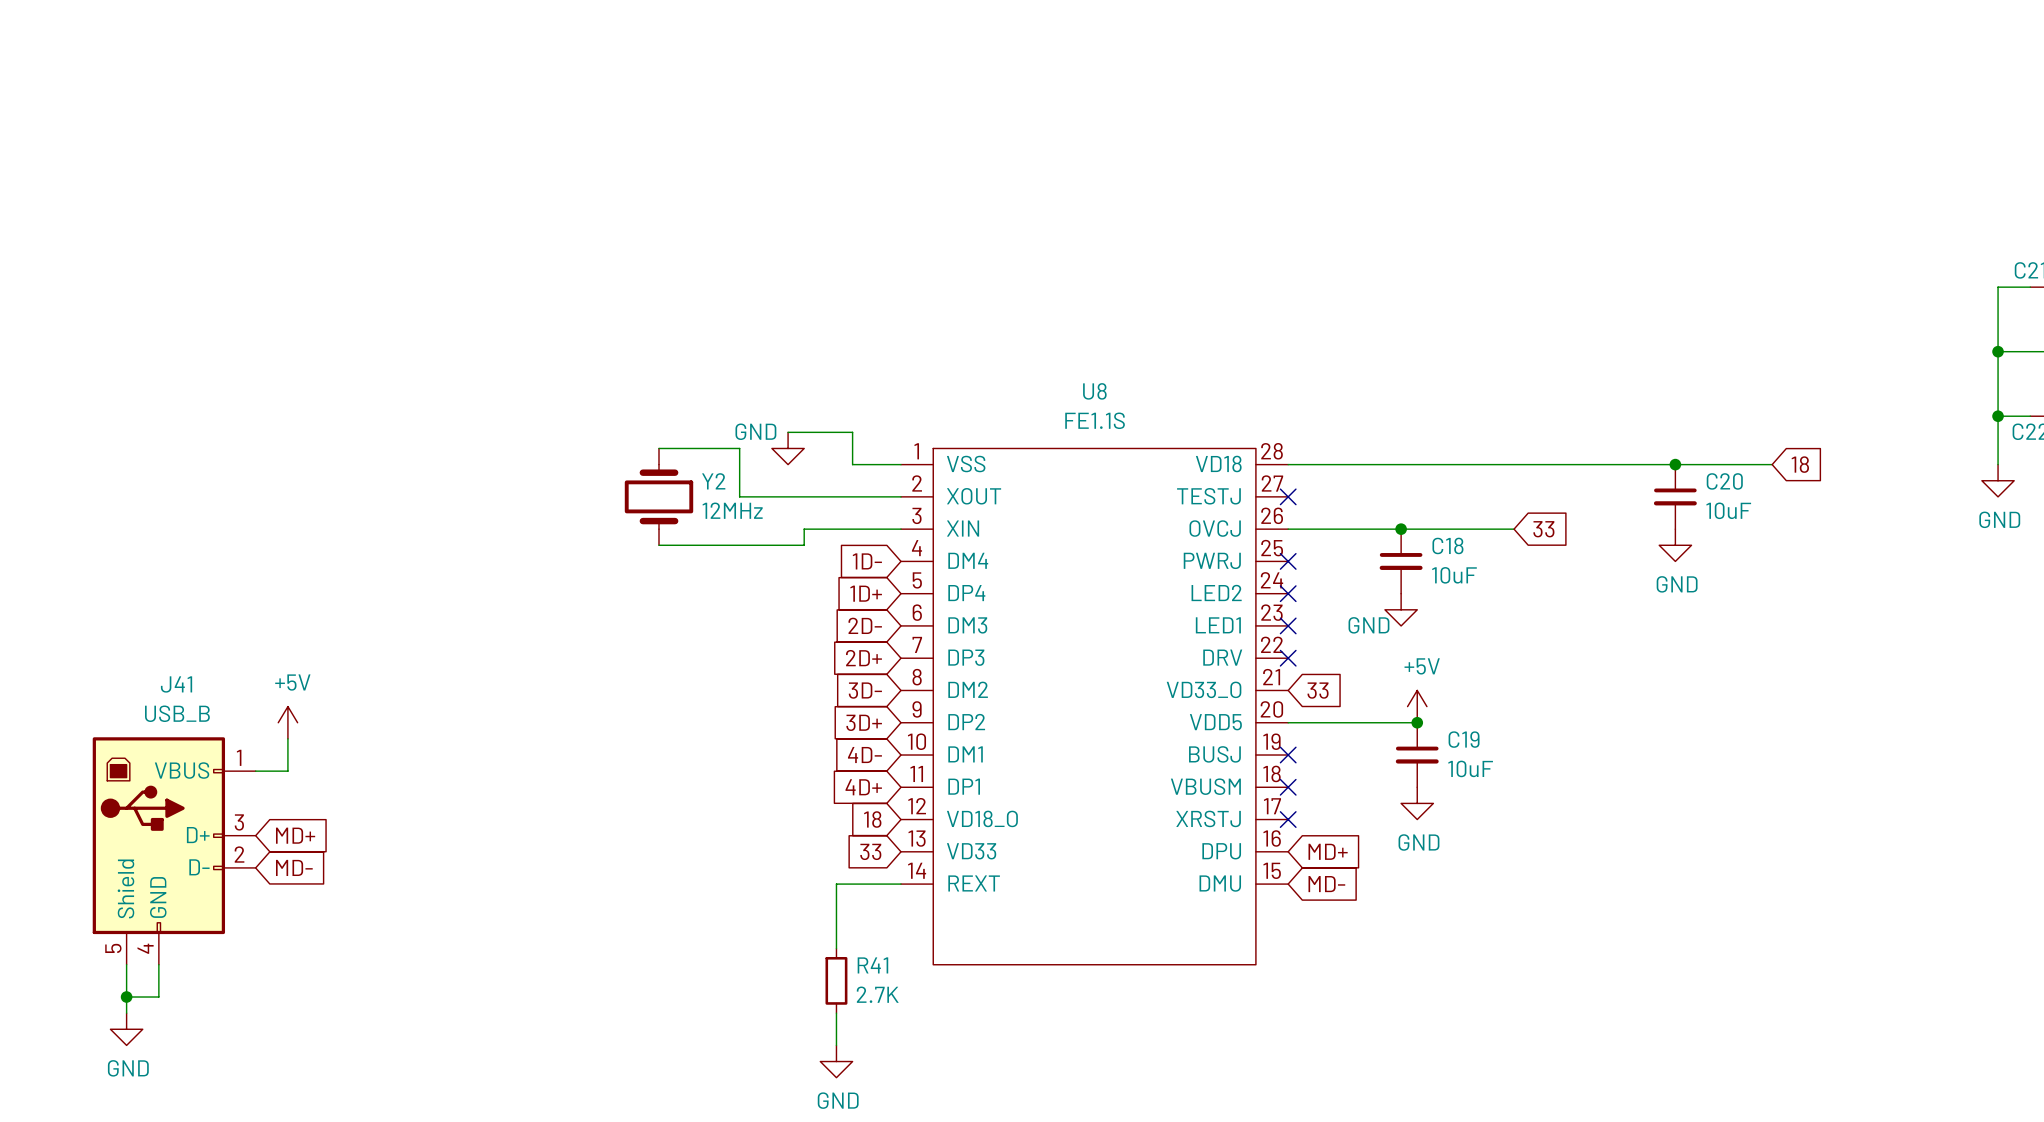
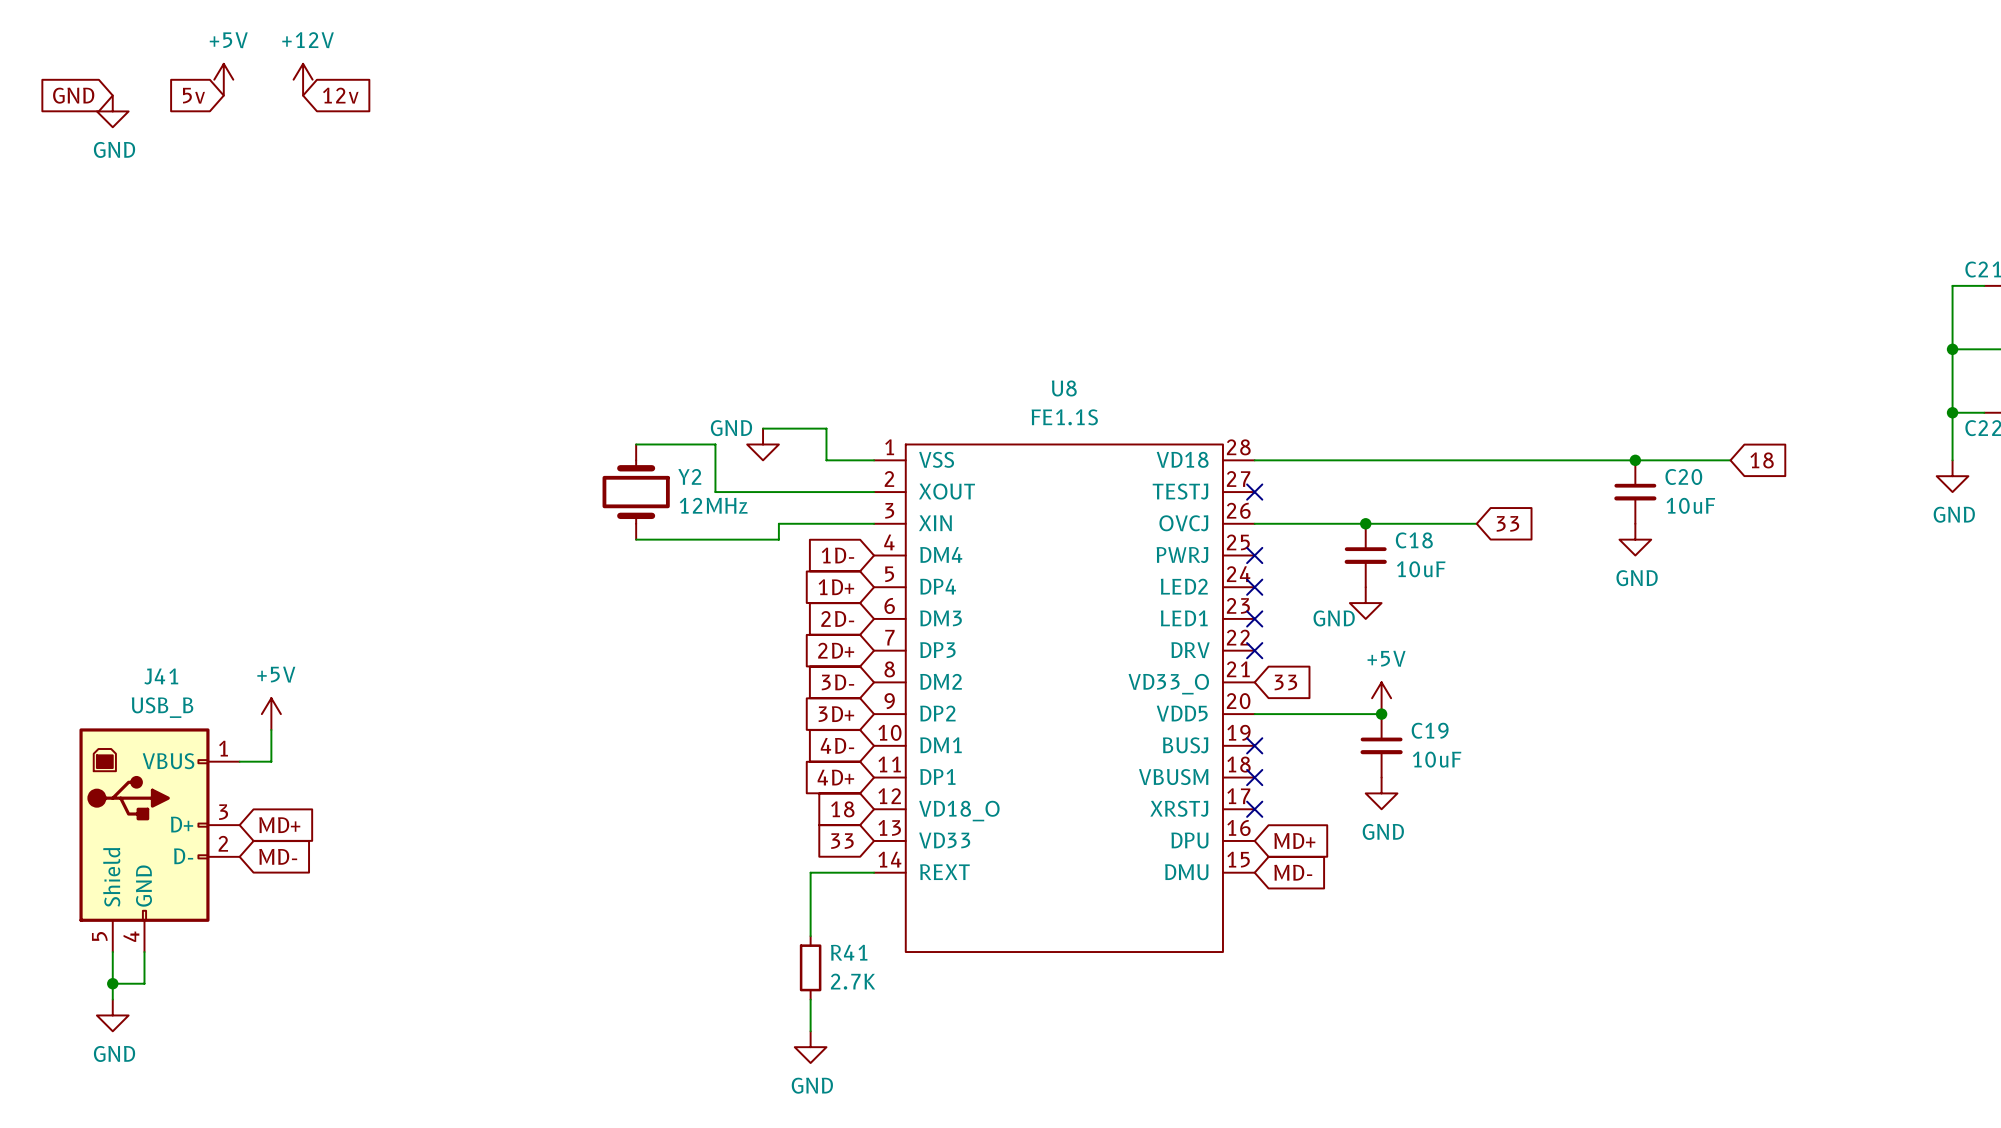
power symbol: none -> +5V (223, 79)
power symbol: none -> +12V (303, 79)
global label: none -> GND (73, 95)
global label: none -> 5v (193, 95)
global label: none -> 12v (340, 95)
power symbol: none -> GND (112, 111)

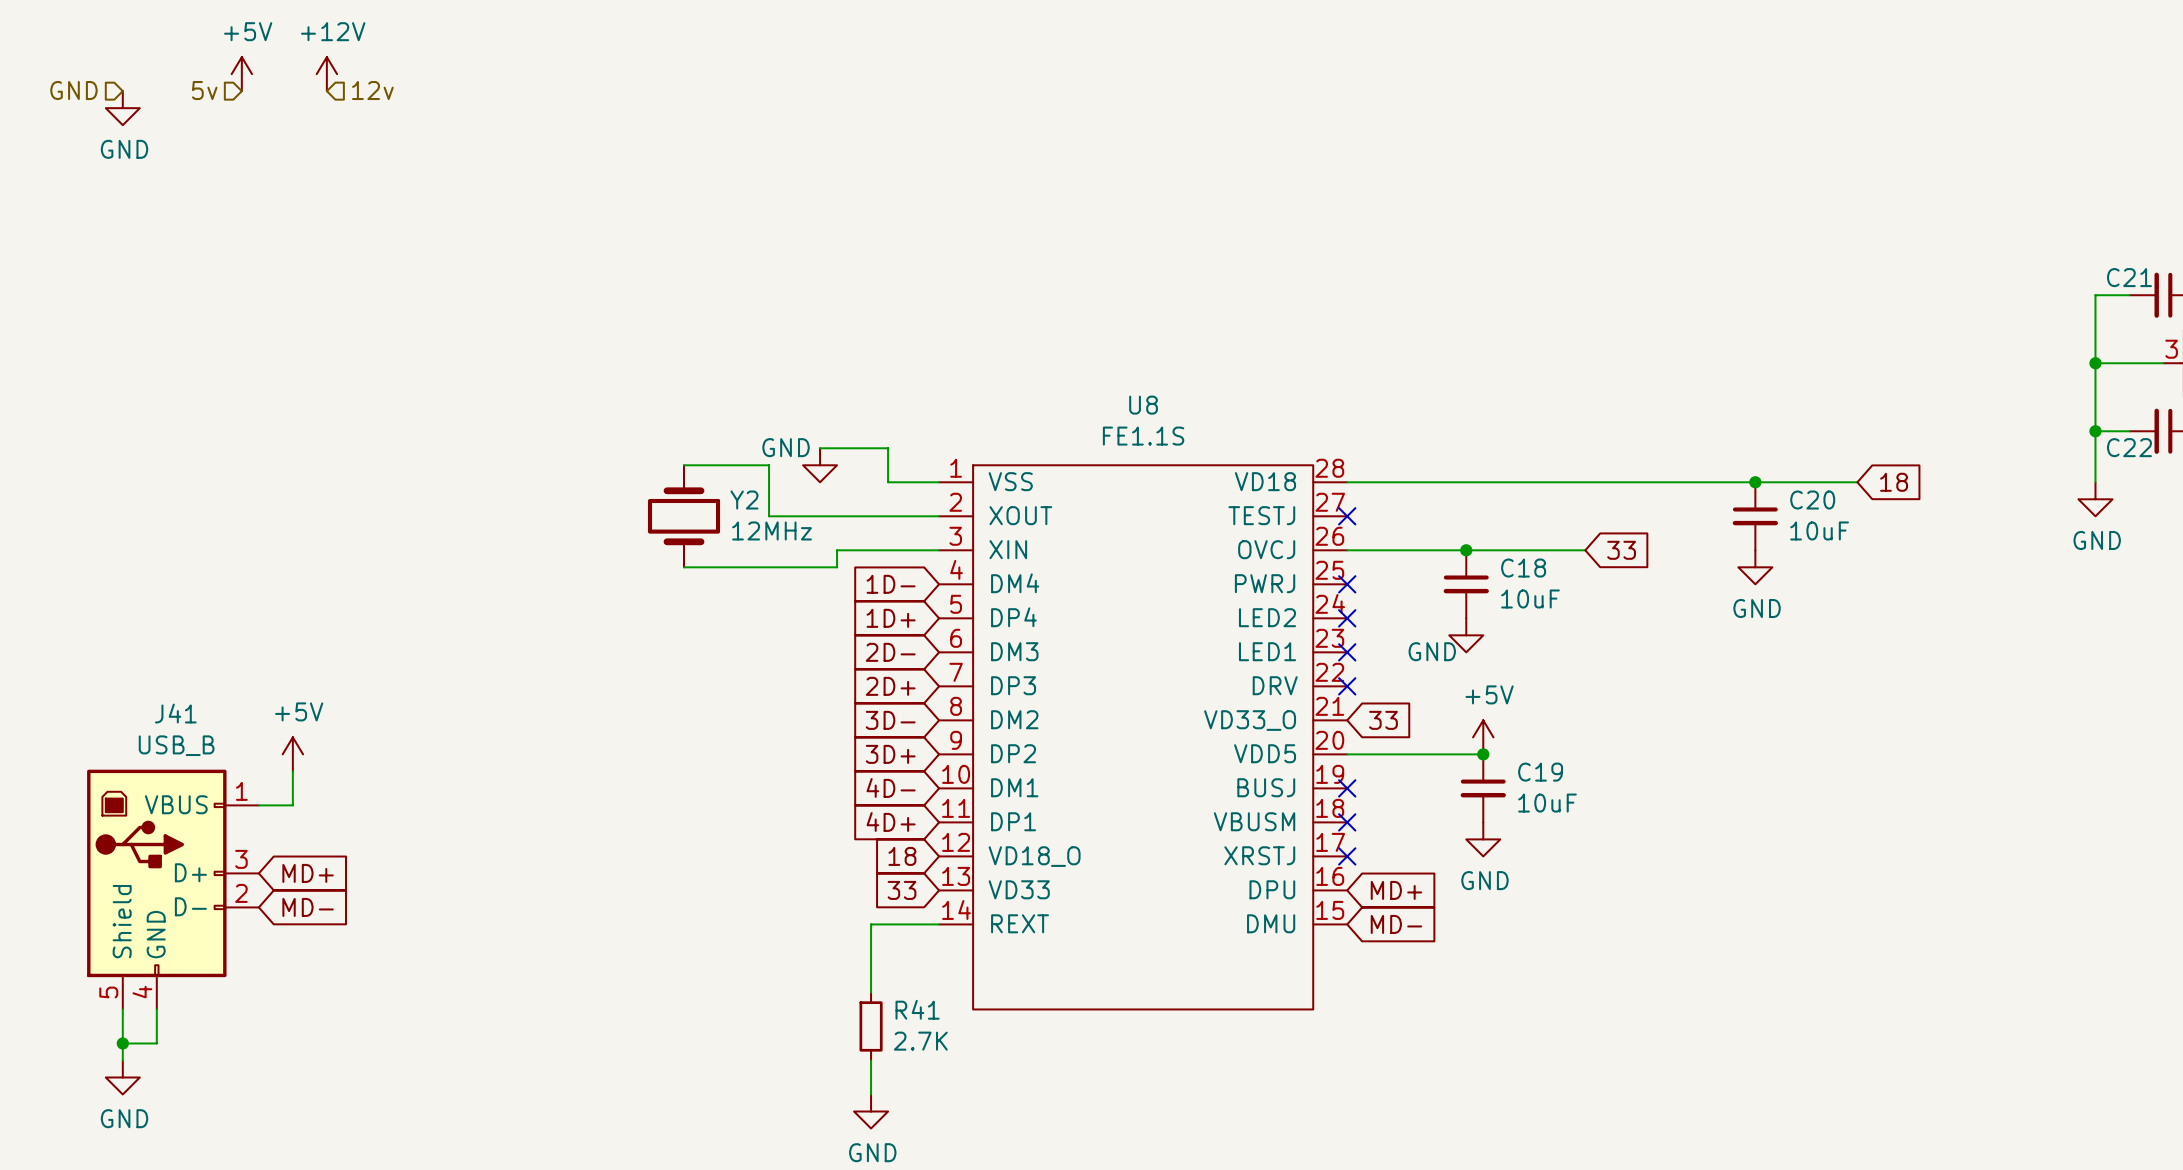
hierarchical label: none -> GND (73, 90)
global label: GND (73, 95) -> none
hierarchical label: none -> 5v (204, 90)
global label: 5v (193, 95) -> none
global label: 12v (340, 95) -> none
hierarchical label: none -> 12v (372, 90)

